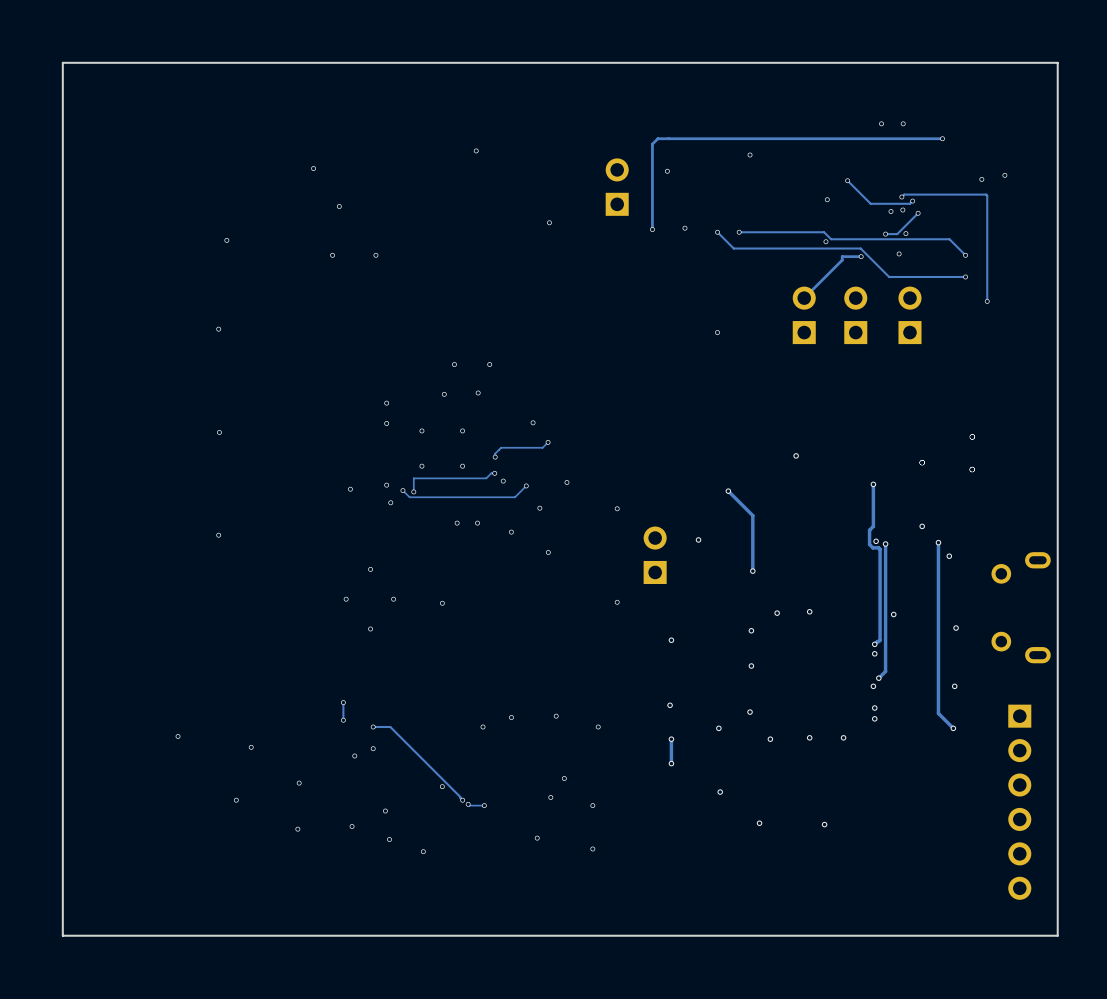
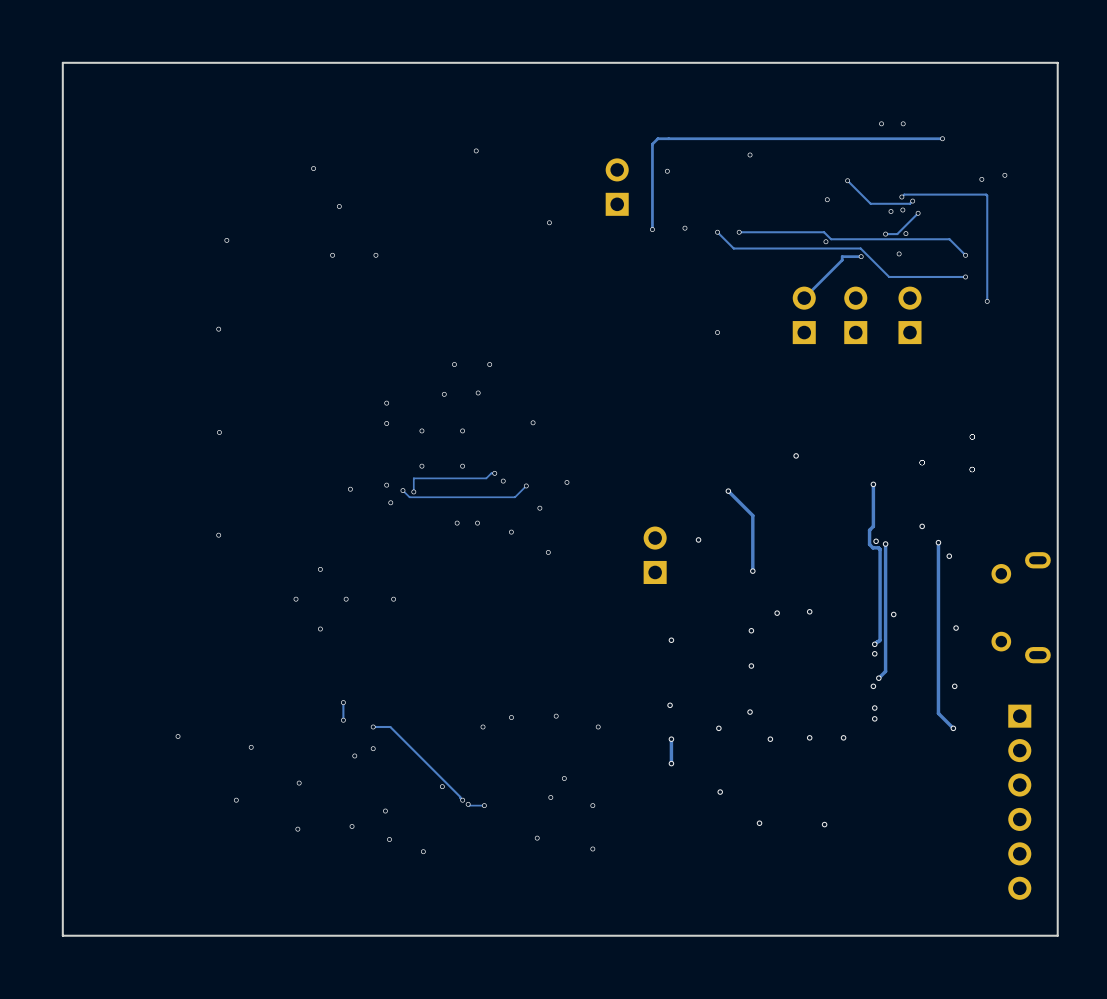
track: (548, 442) (542, 447) (501, 447) (495, 453) (495, 457) -> none
via: (548, 442) -> none
via: (495, 457) -> none
via: (617, 508) -> none
via: none -> (320, 569)
via: (370, 569) -> none
via: none -> (296, 599)
via: (617, 602) -> none
via: (442, 603) -> none
via: none -> (320, 629)
via: (370, 629) -> none

